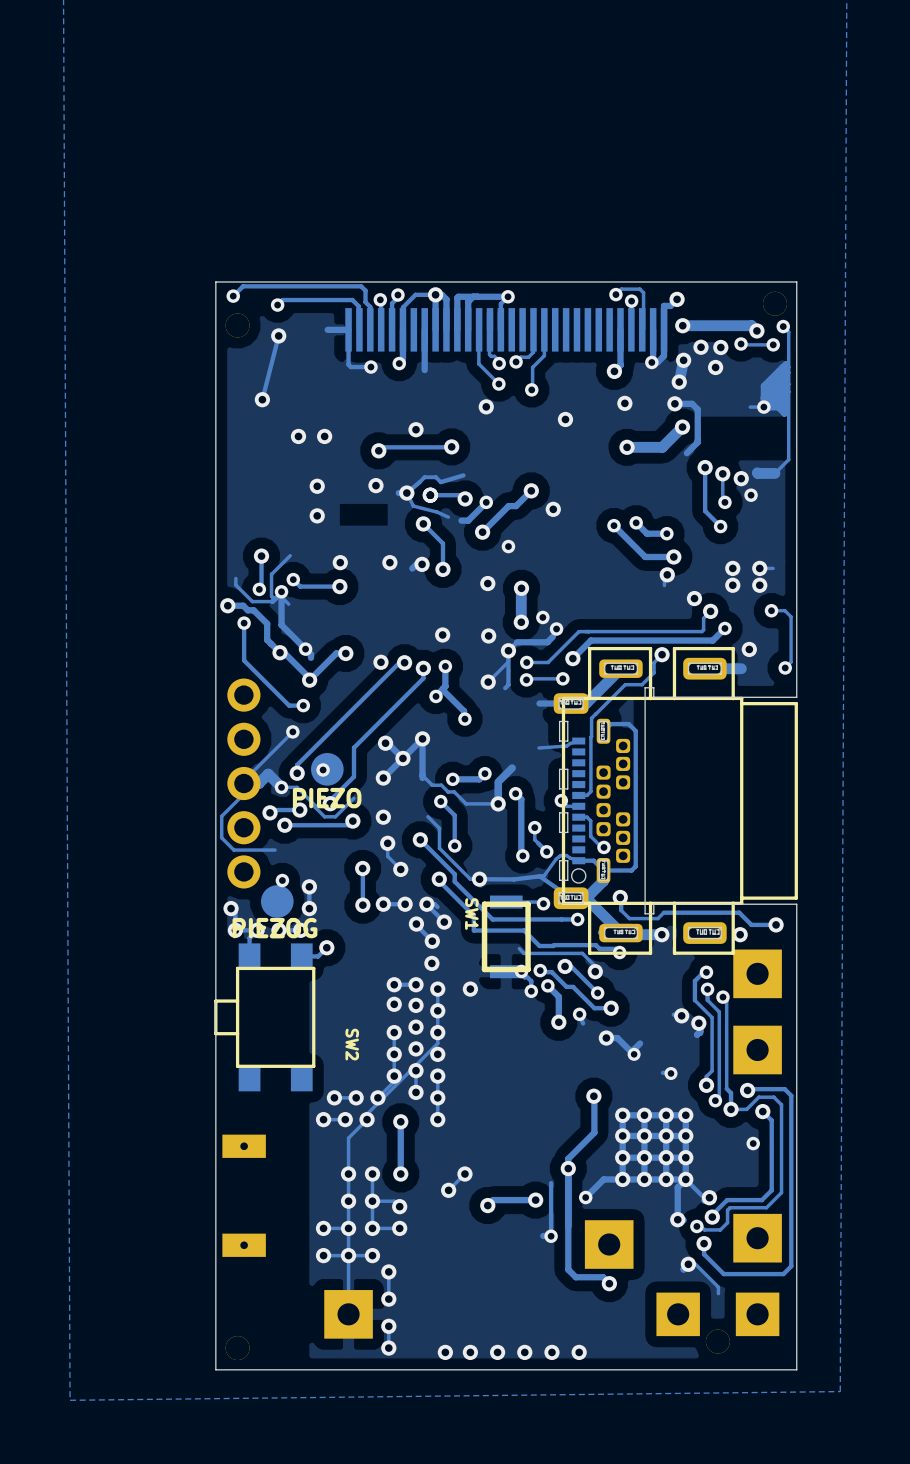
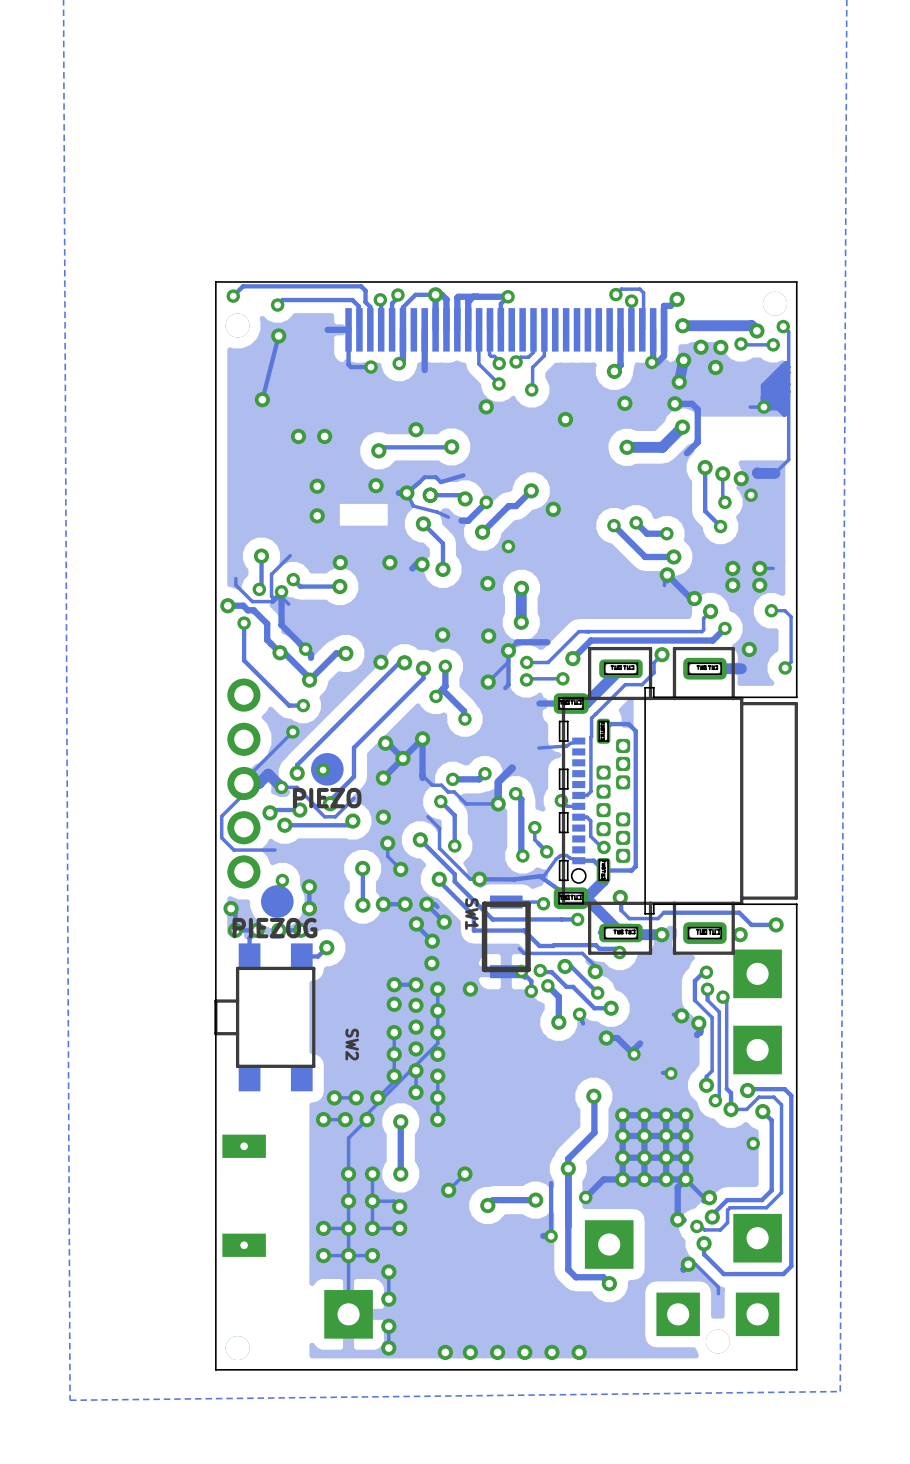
track: none -> (667, 580) (667, 574) (691, 598) (694, 598)
via: (542, 617) -> none
via: (556, 629) -> none
track: (552, 636) (547, 642) -> none

